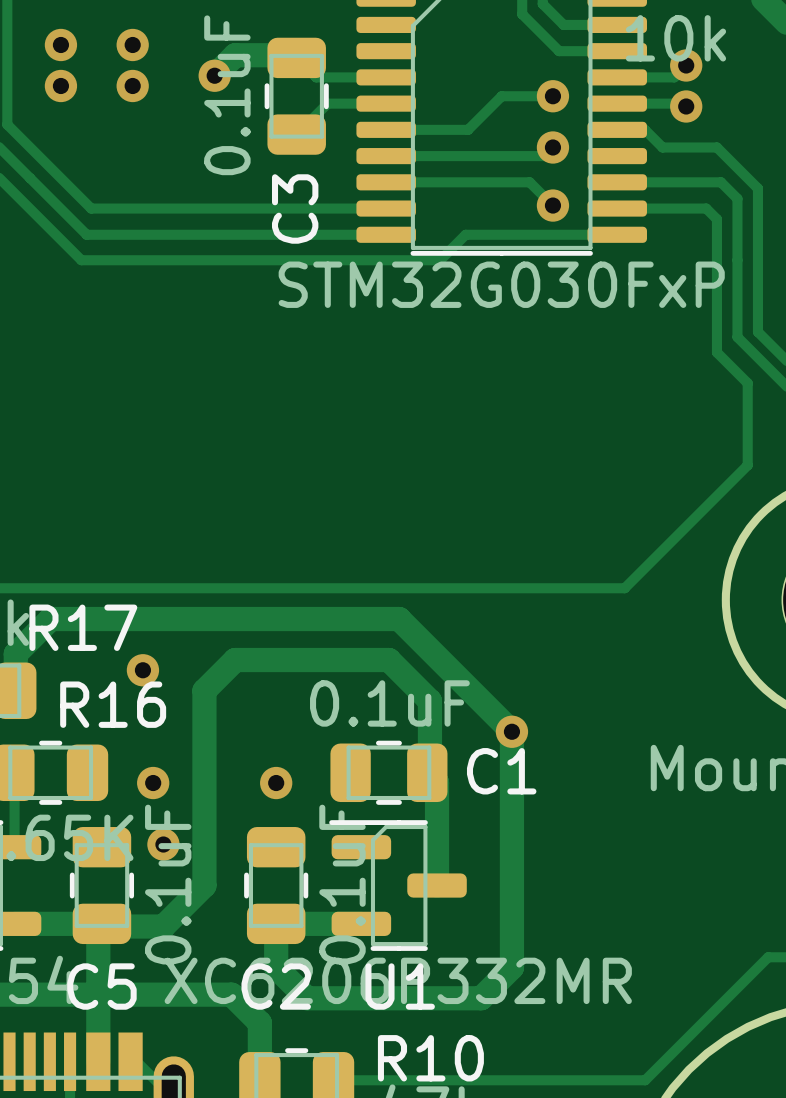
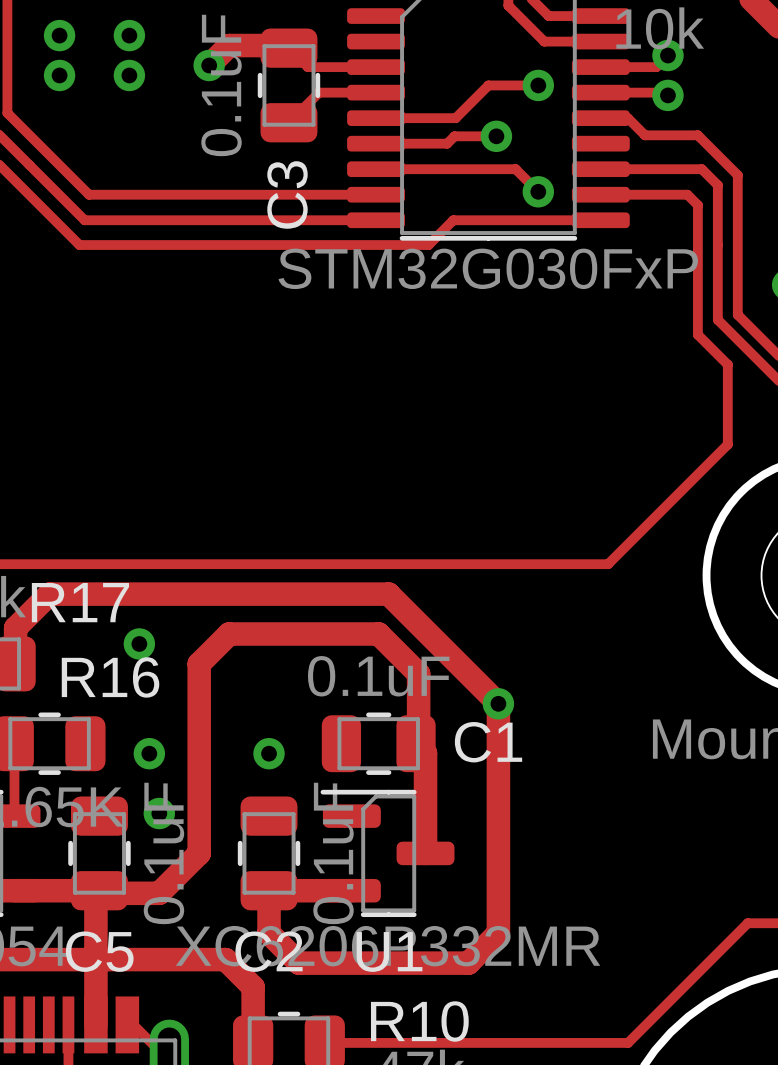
track: (552, 147) (544, 156) (459, 156) -> (496, 136) (454, 136) (447, 143)
via position: (552, 147) -> (496, 136)

